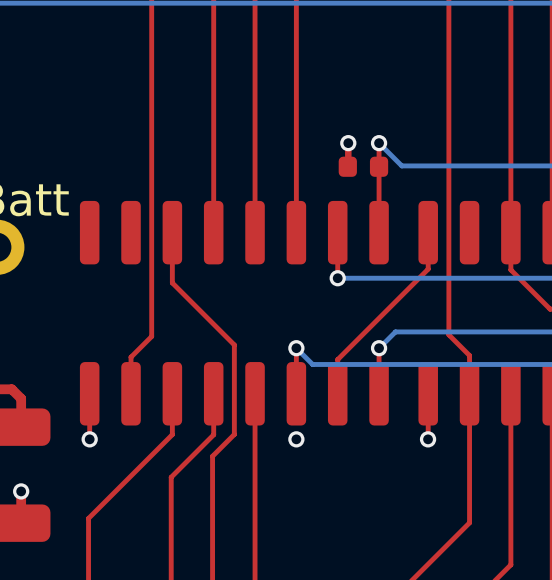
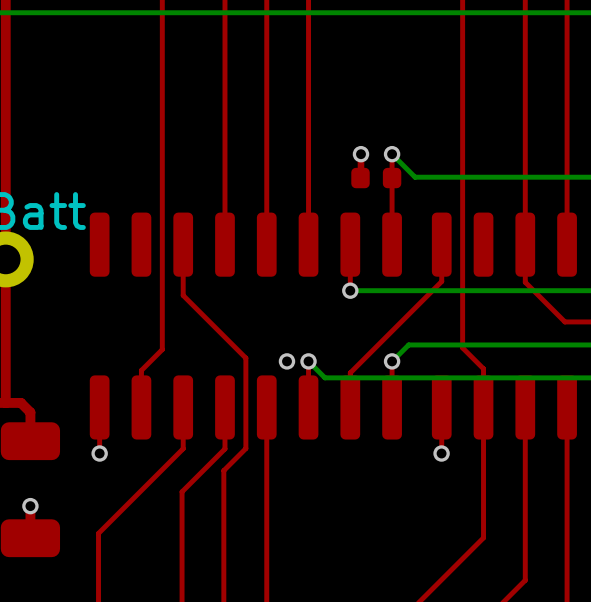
via position: (296, 439) -> (286, 361)

